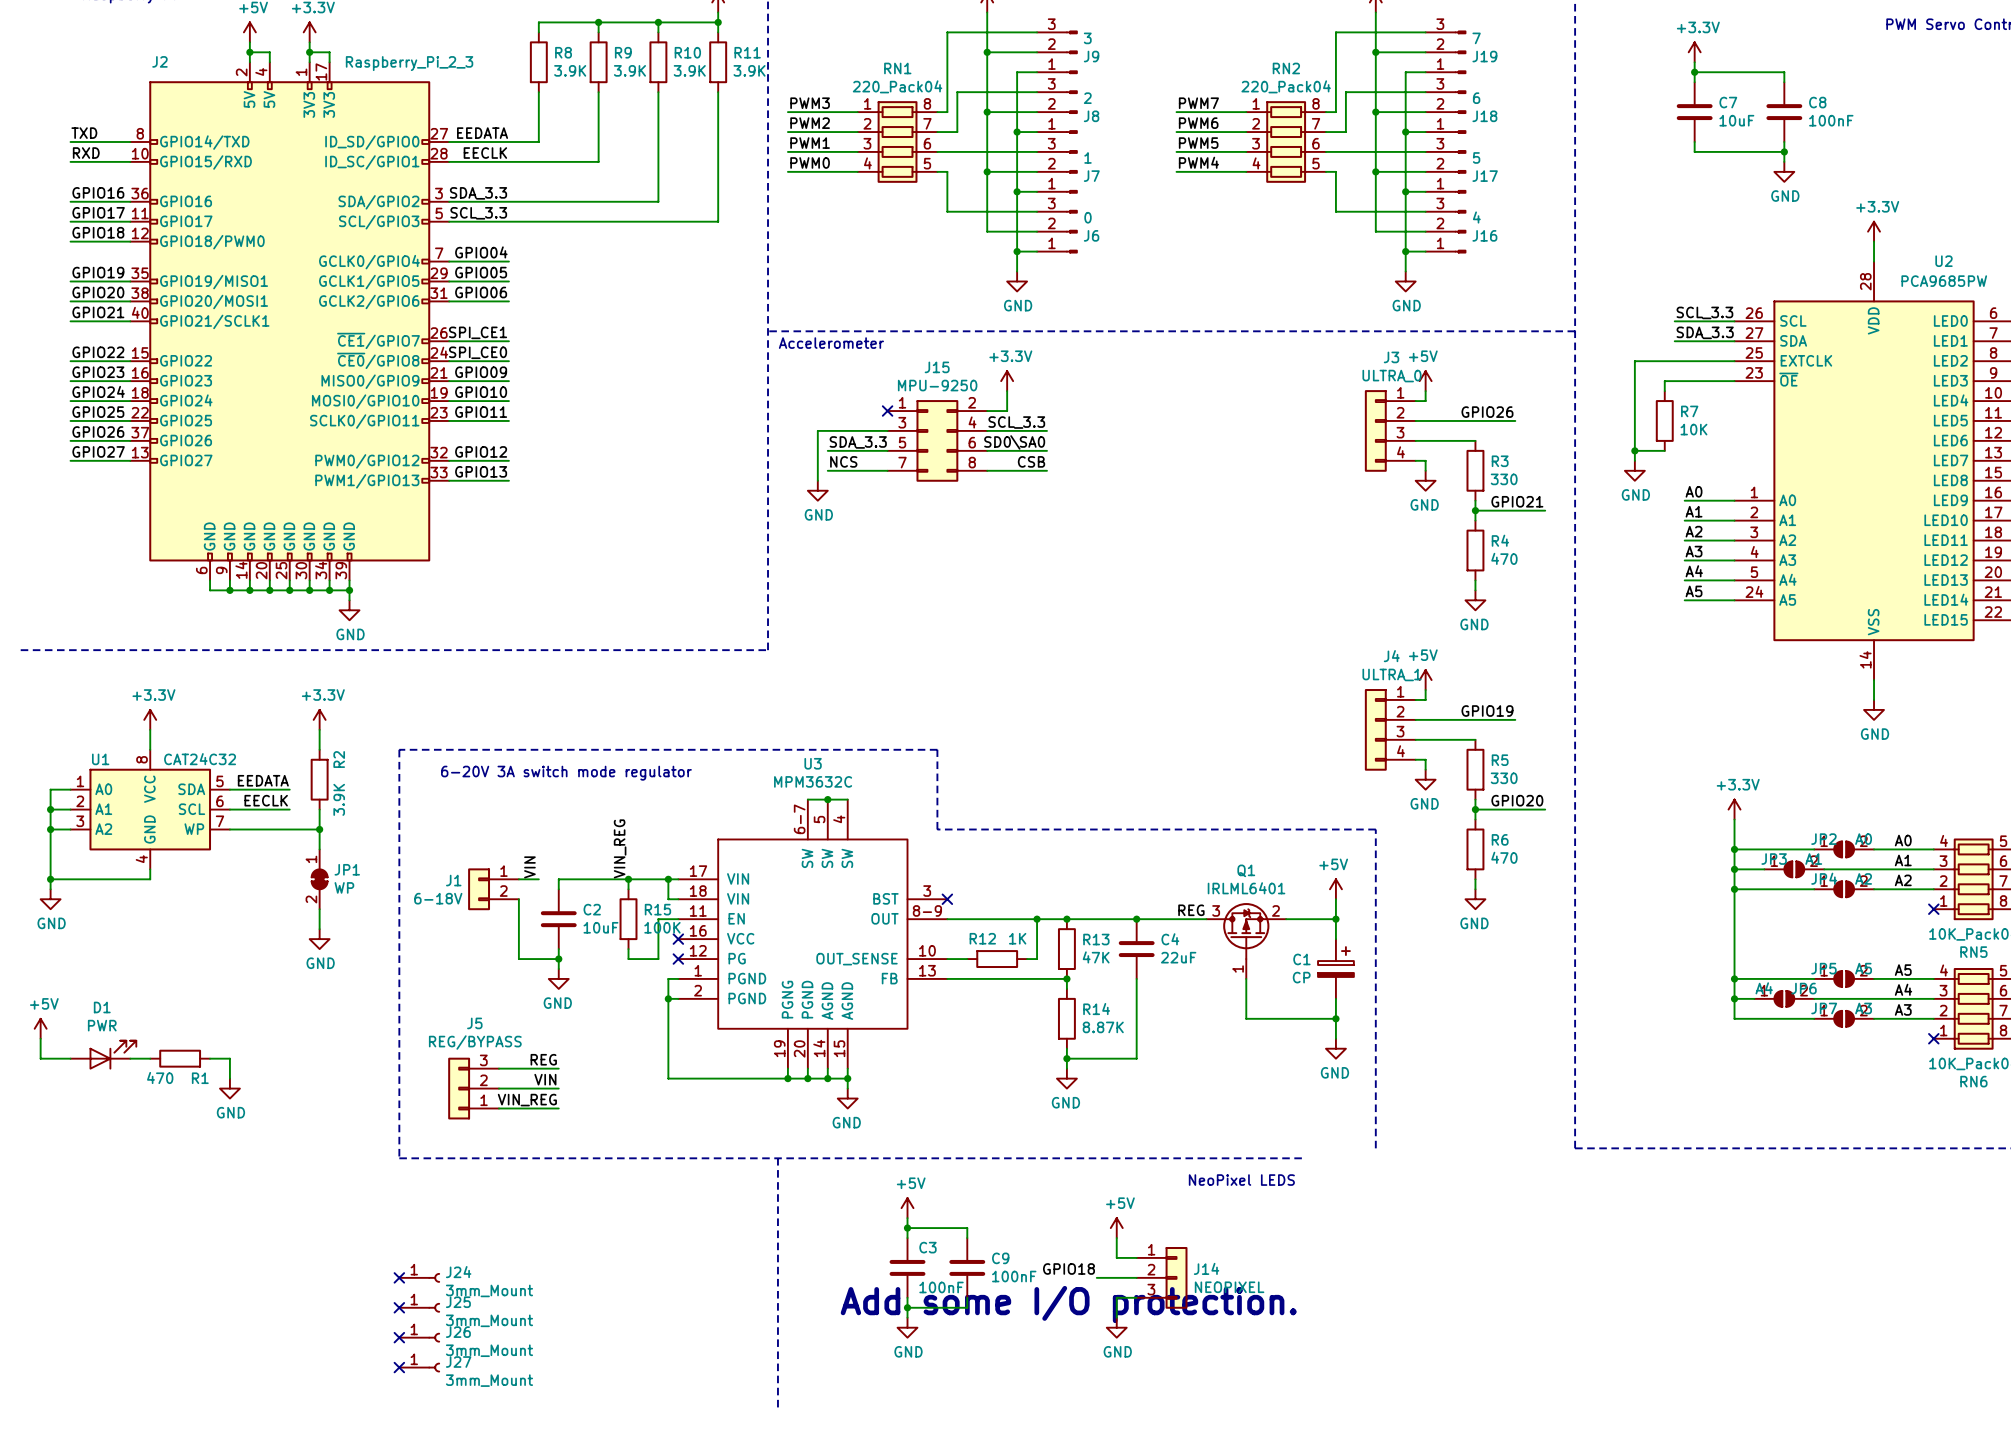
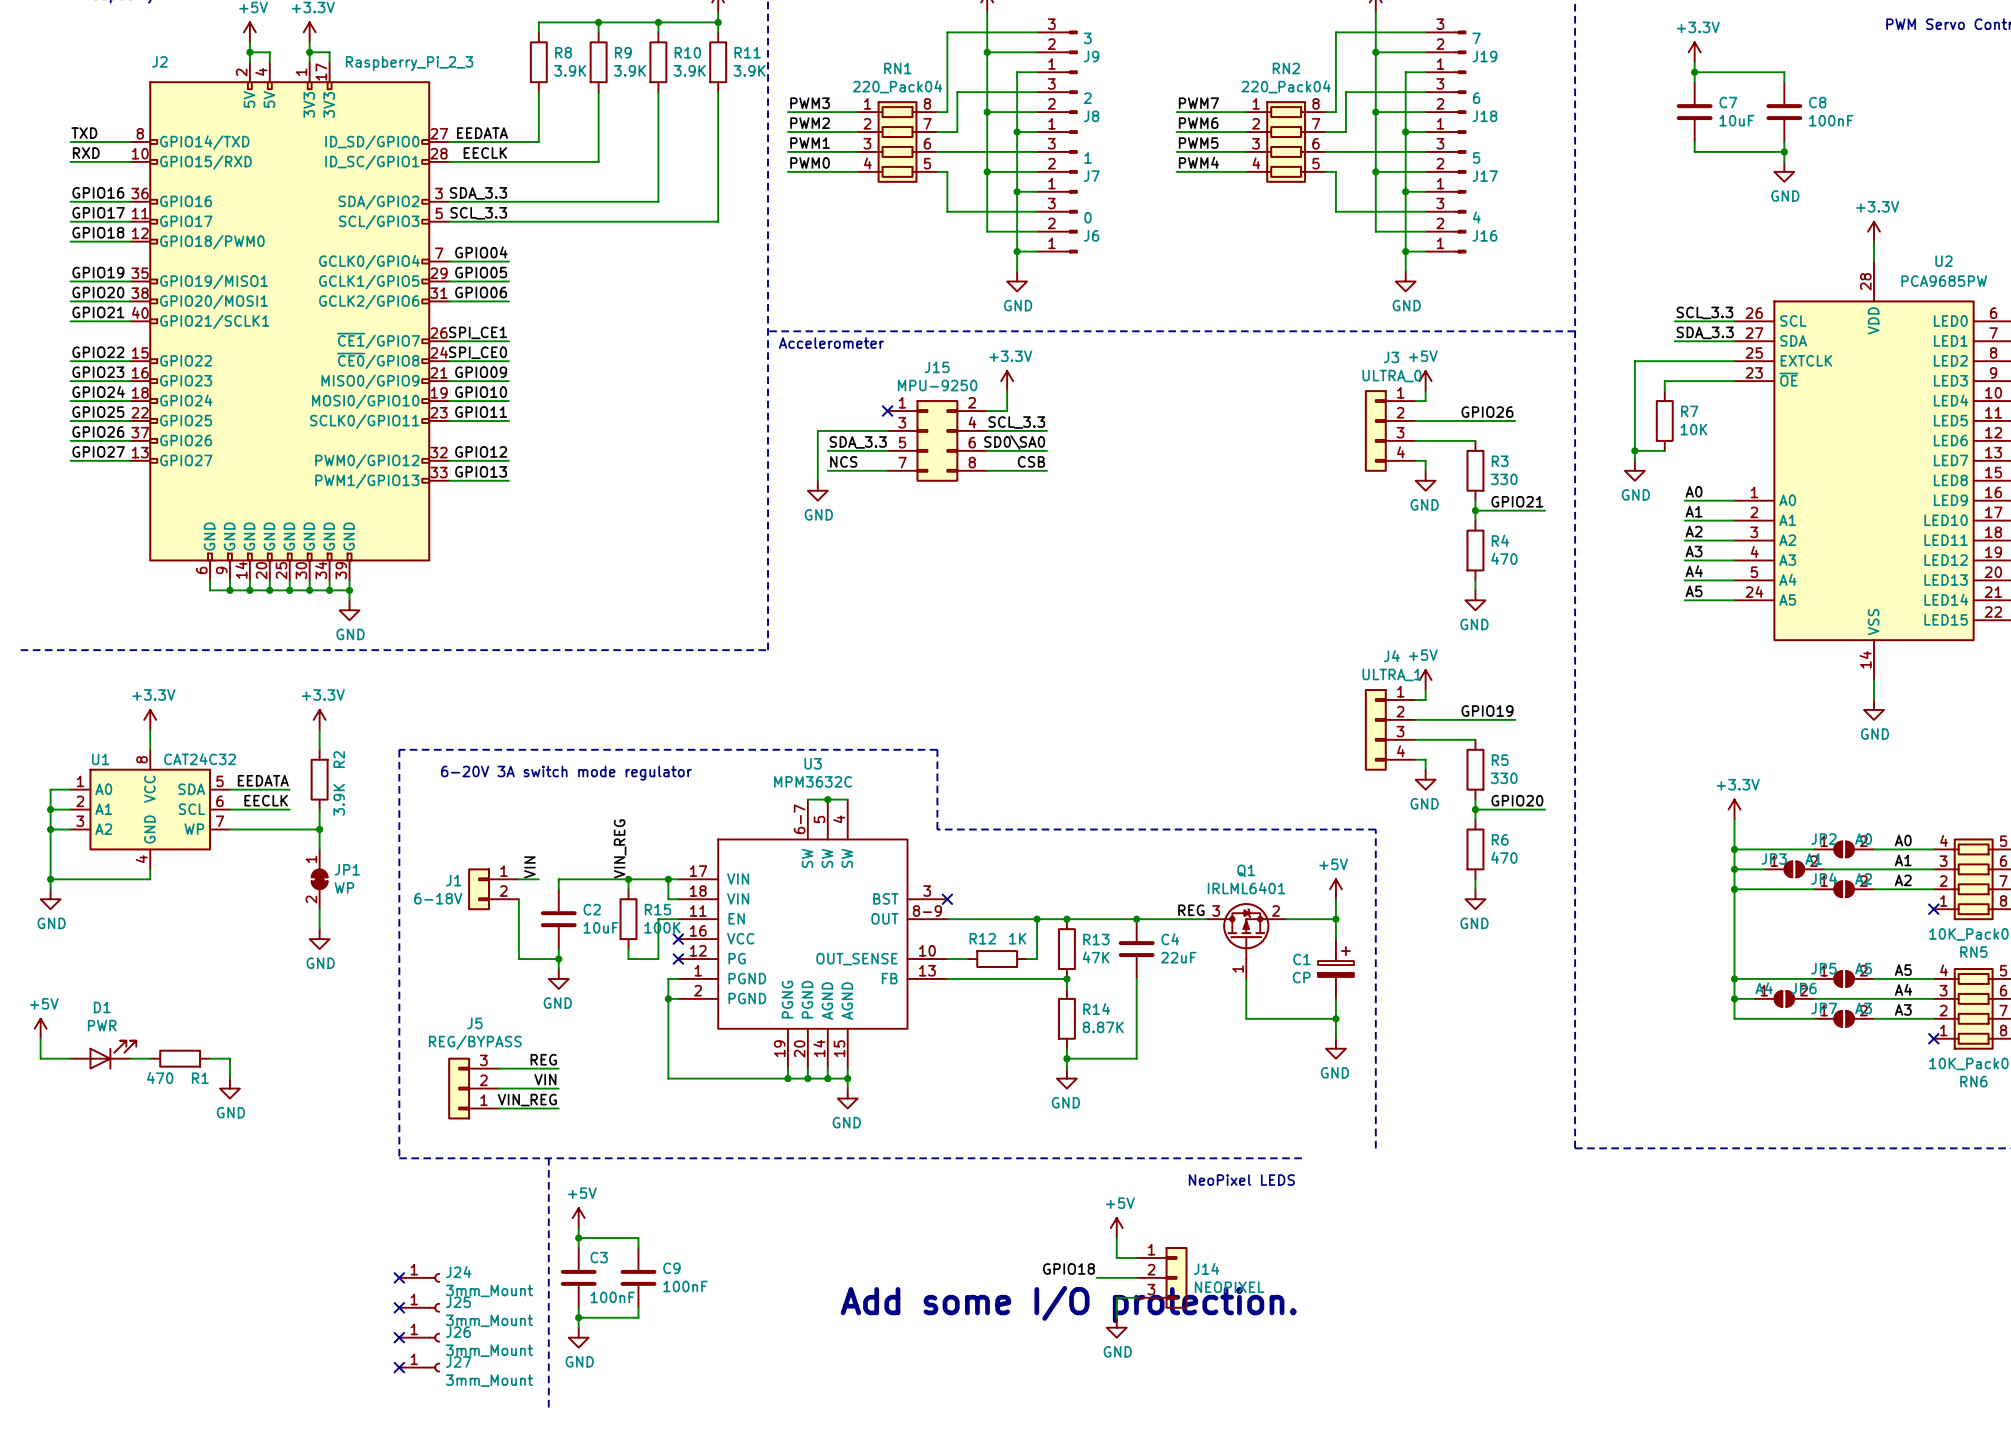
line: none -> (548, 1158) (548, 1407)
line: (777, 1158) (777, 1407) -> none
power symbol: +5V (907, 1208) -> none
power symbol: none -> +5V (578, 1218)
wire: (907, 1218) (907, 1238) -> none
wire: none -> (578, 1228) (578, 1247)
wire: (907, 1228) (967, 1228) (967, 1238) -> none
junction: (907, 1228) -> none
wire: none -> (578, 1238) (638, 1238) (638, 1247)
junction: none -> (578, 1238)
C3 position: (907, 1267) -> (578, 1277)
C9 position: (967, 1267) -> (638, 1277)
wire: (907, 1297) (907, 1317) -> none
wire: (967, 1297) (967, 1307) (907, 1307) -> none
wire: none -> (578, 1307) (578, 1327)
wire: none -> (638, 1307) (638, 1317) (578, 1317)
junction: (907, 1307) -> none
junction: none -> (578, 1317)
power symbol: GND (907, 1327) -> none
power symbol: none -> GND (578, 1337)

